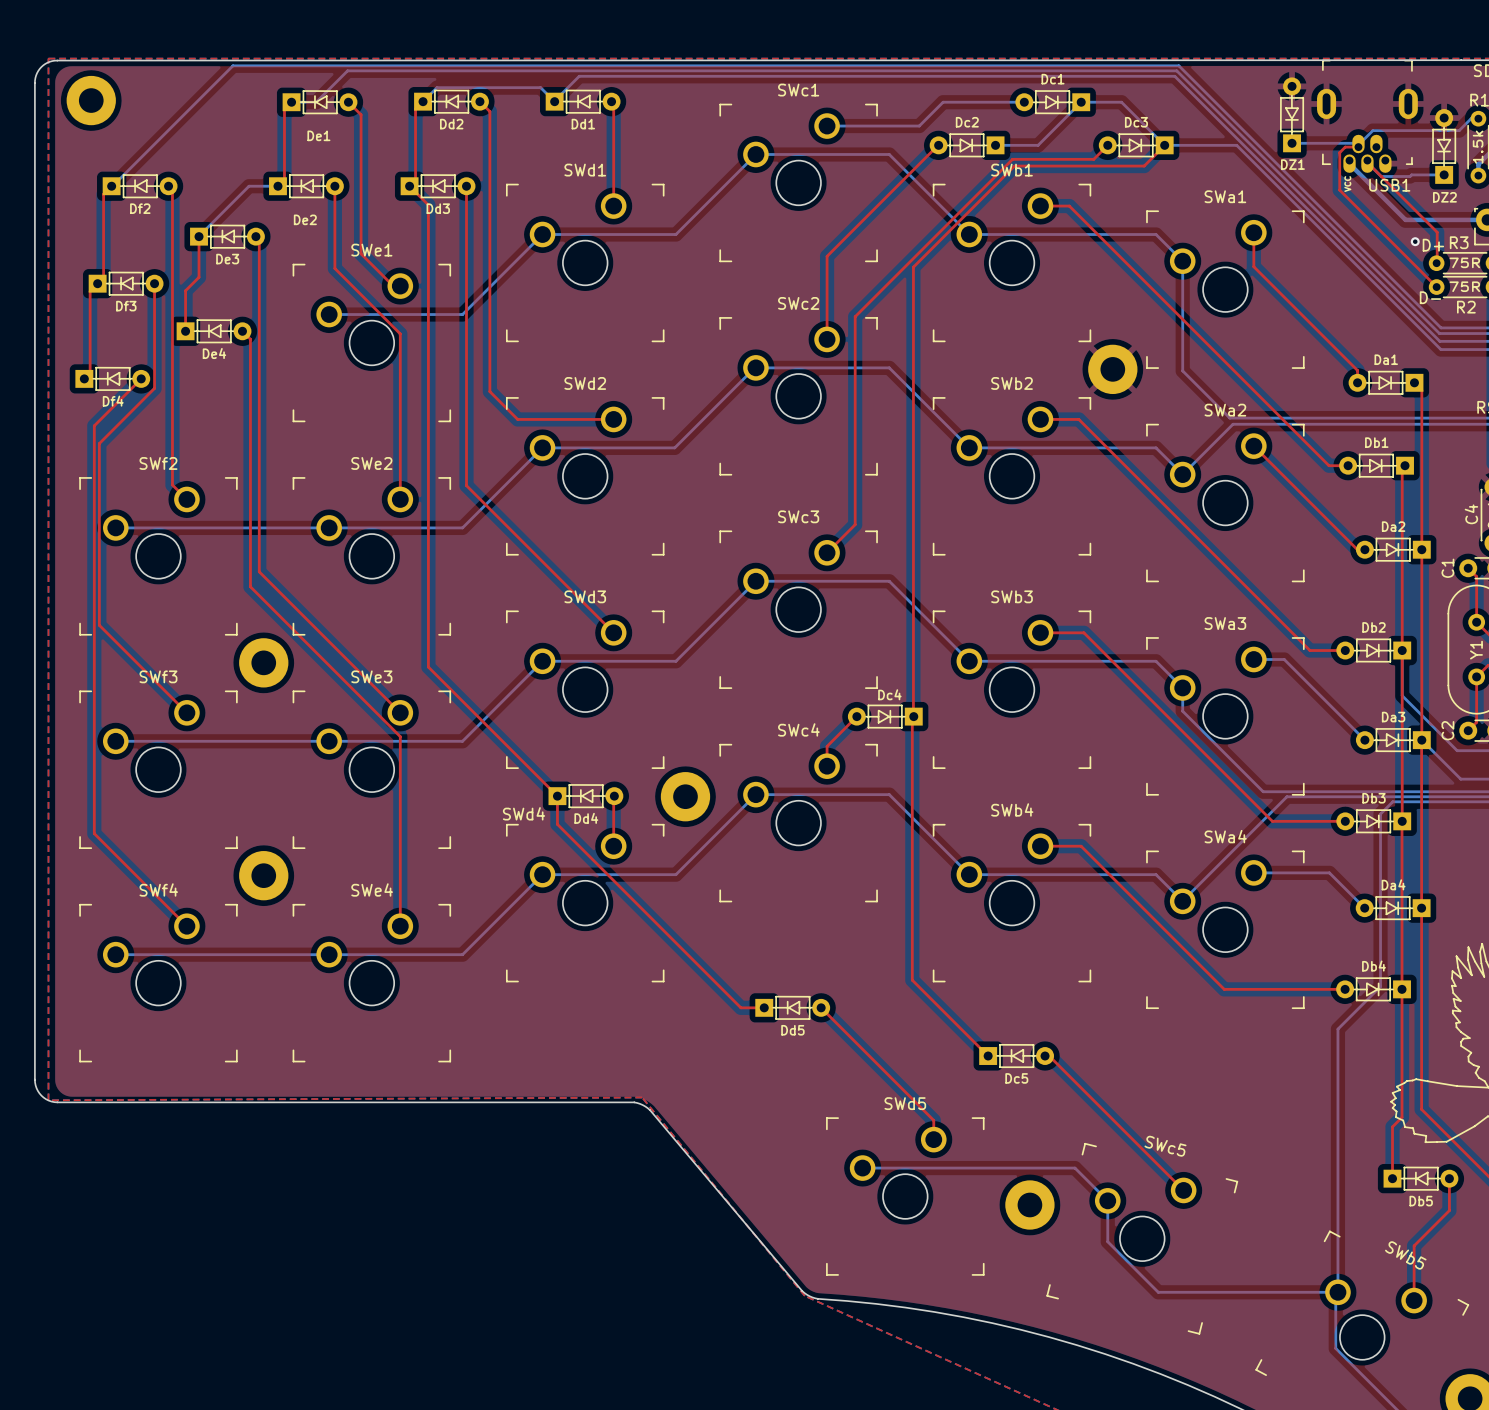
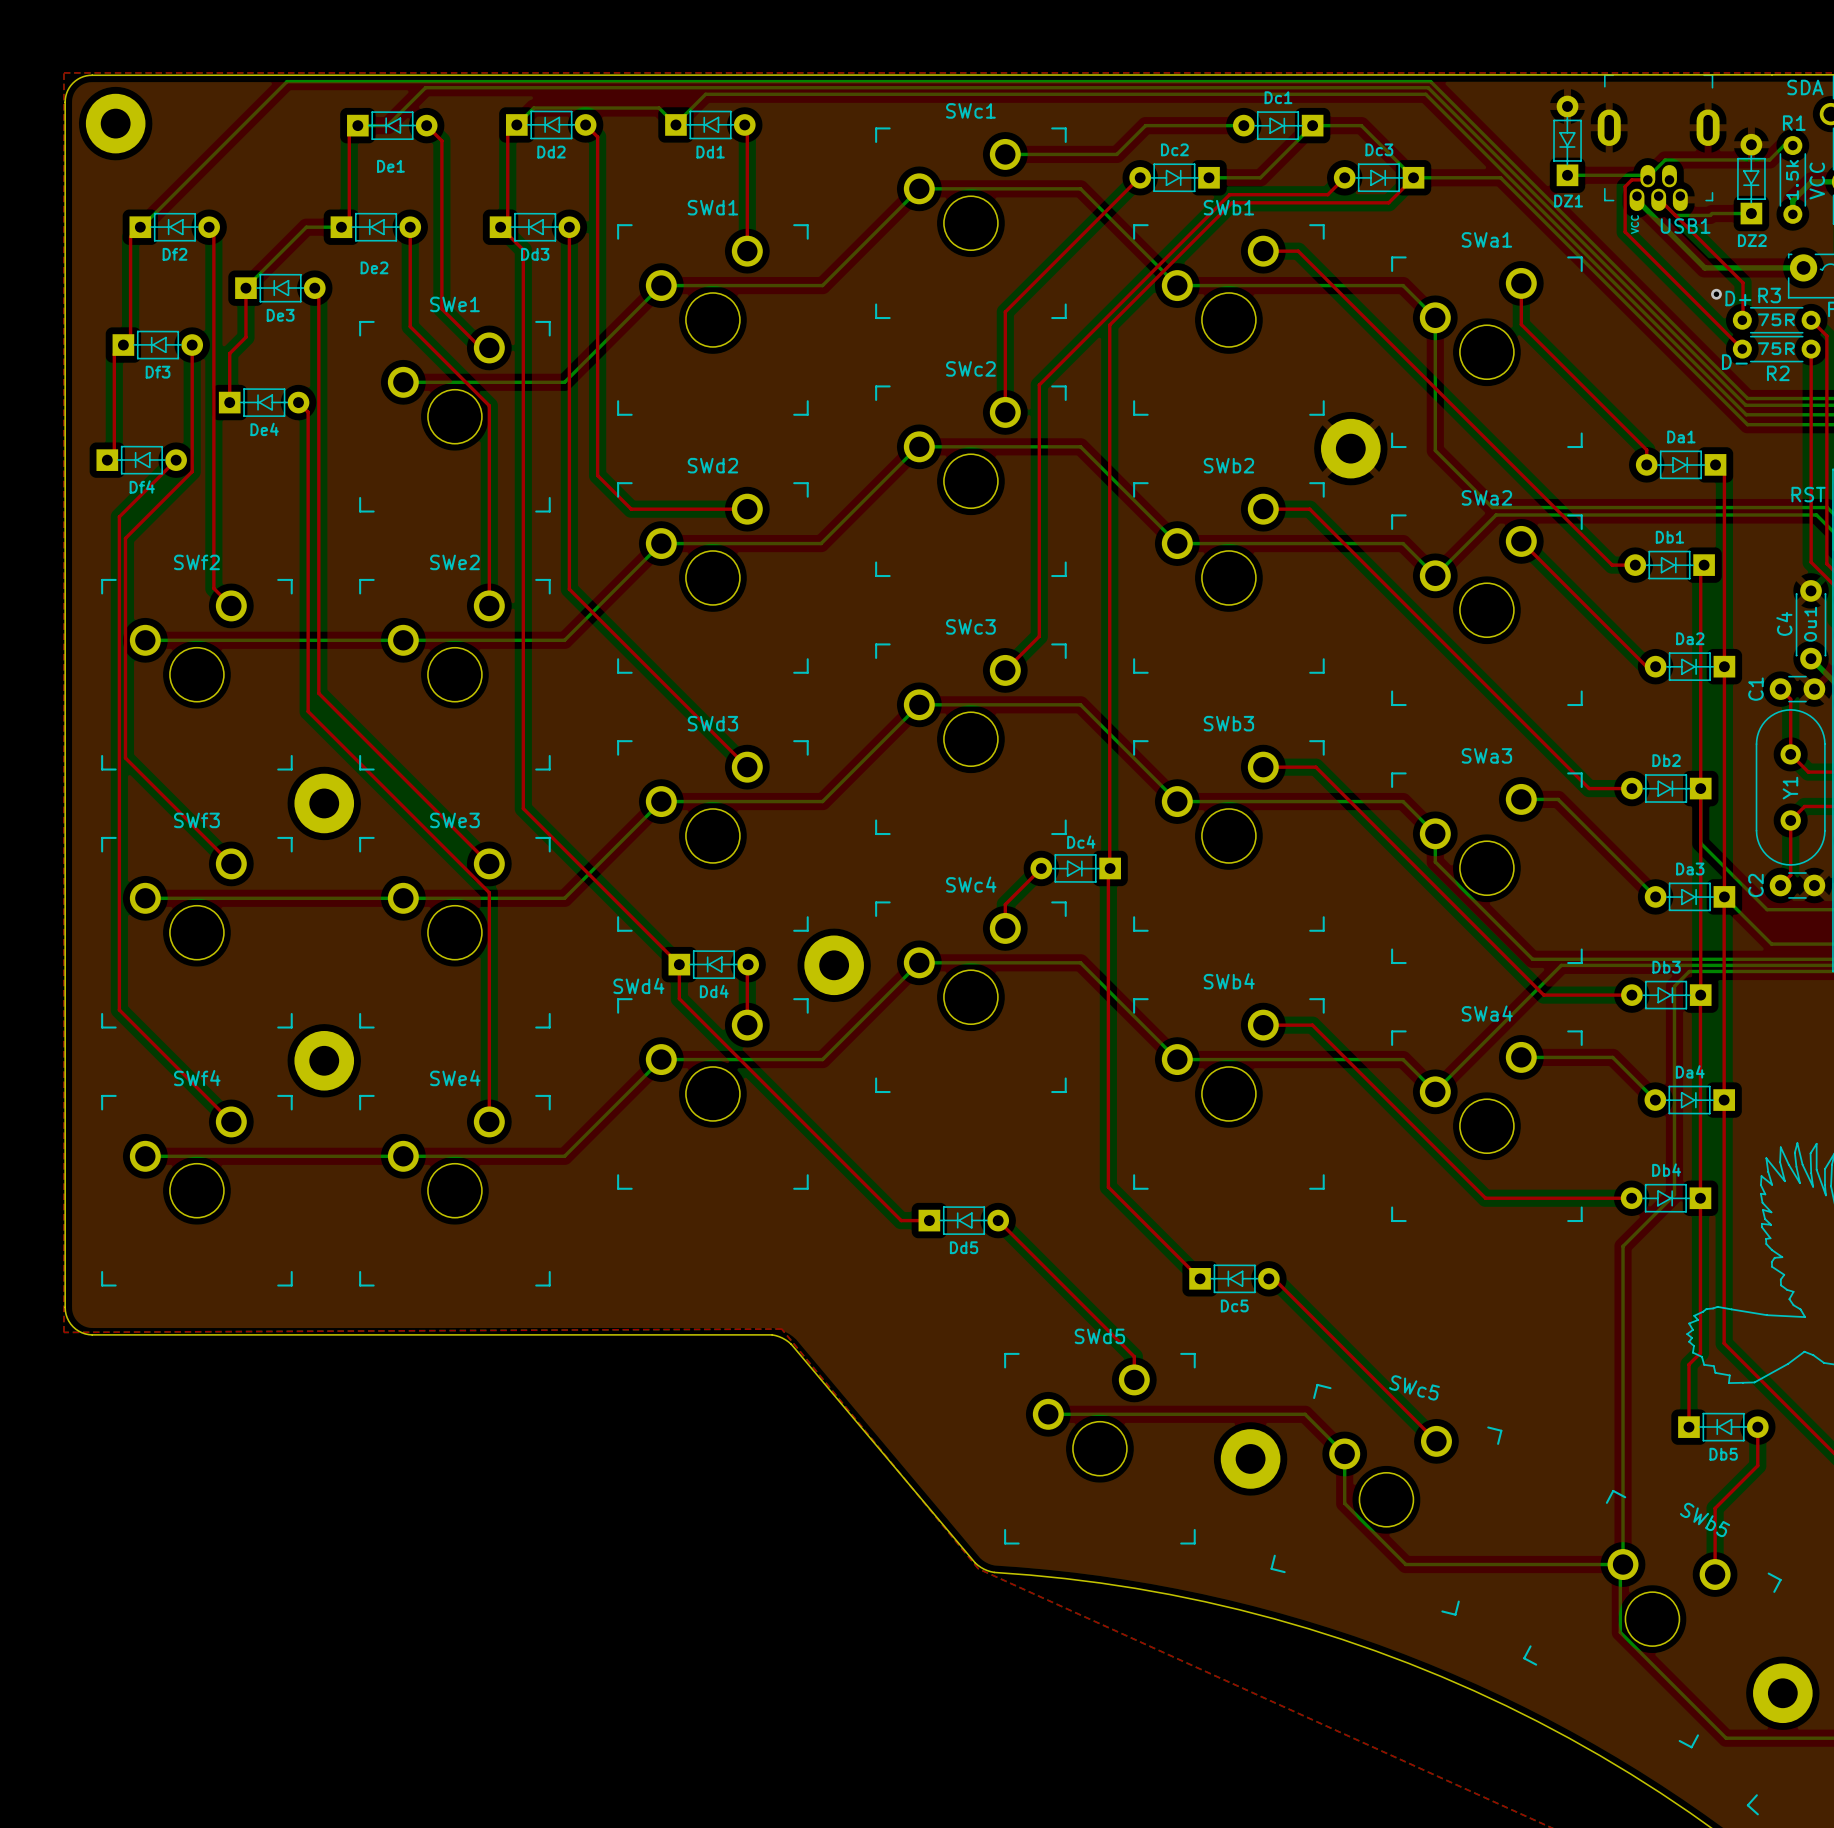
board edge: (71, 60) (54, 60) (45, 63) (37, 73) (34, 82) (34, 1079) (37, 1090) (46, 1099) (54, 1102) (71, 1102) -> (92, 75) (83, 76) (73, 83) (66, 93) (65, 102) (65, 1307) (67, 1317) (73, 1326) (81, 1332) (92, 1334)

